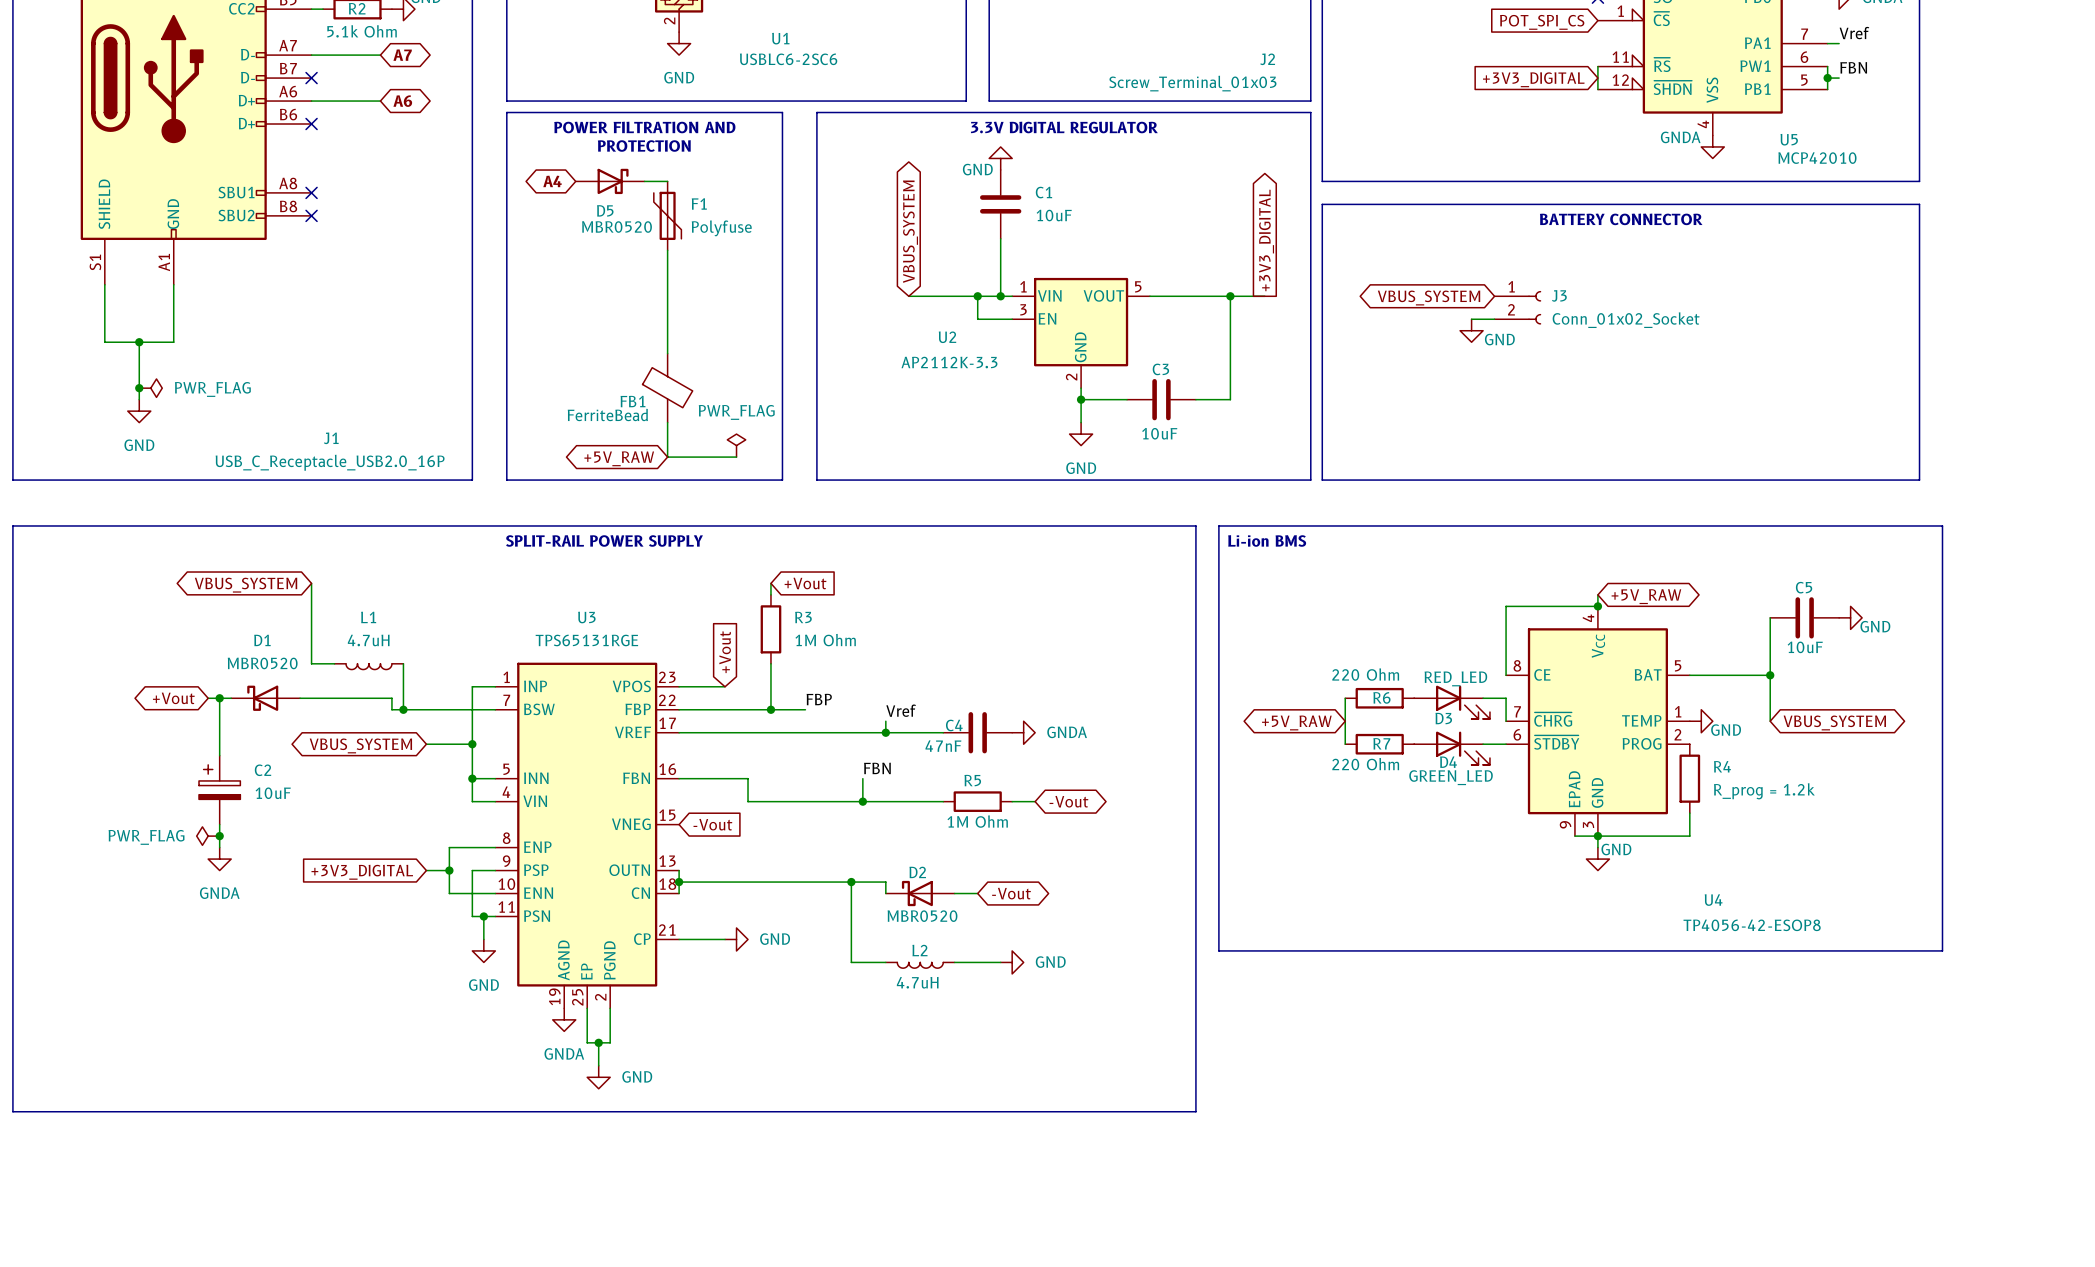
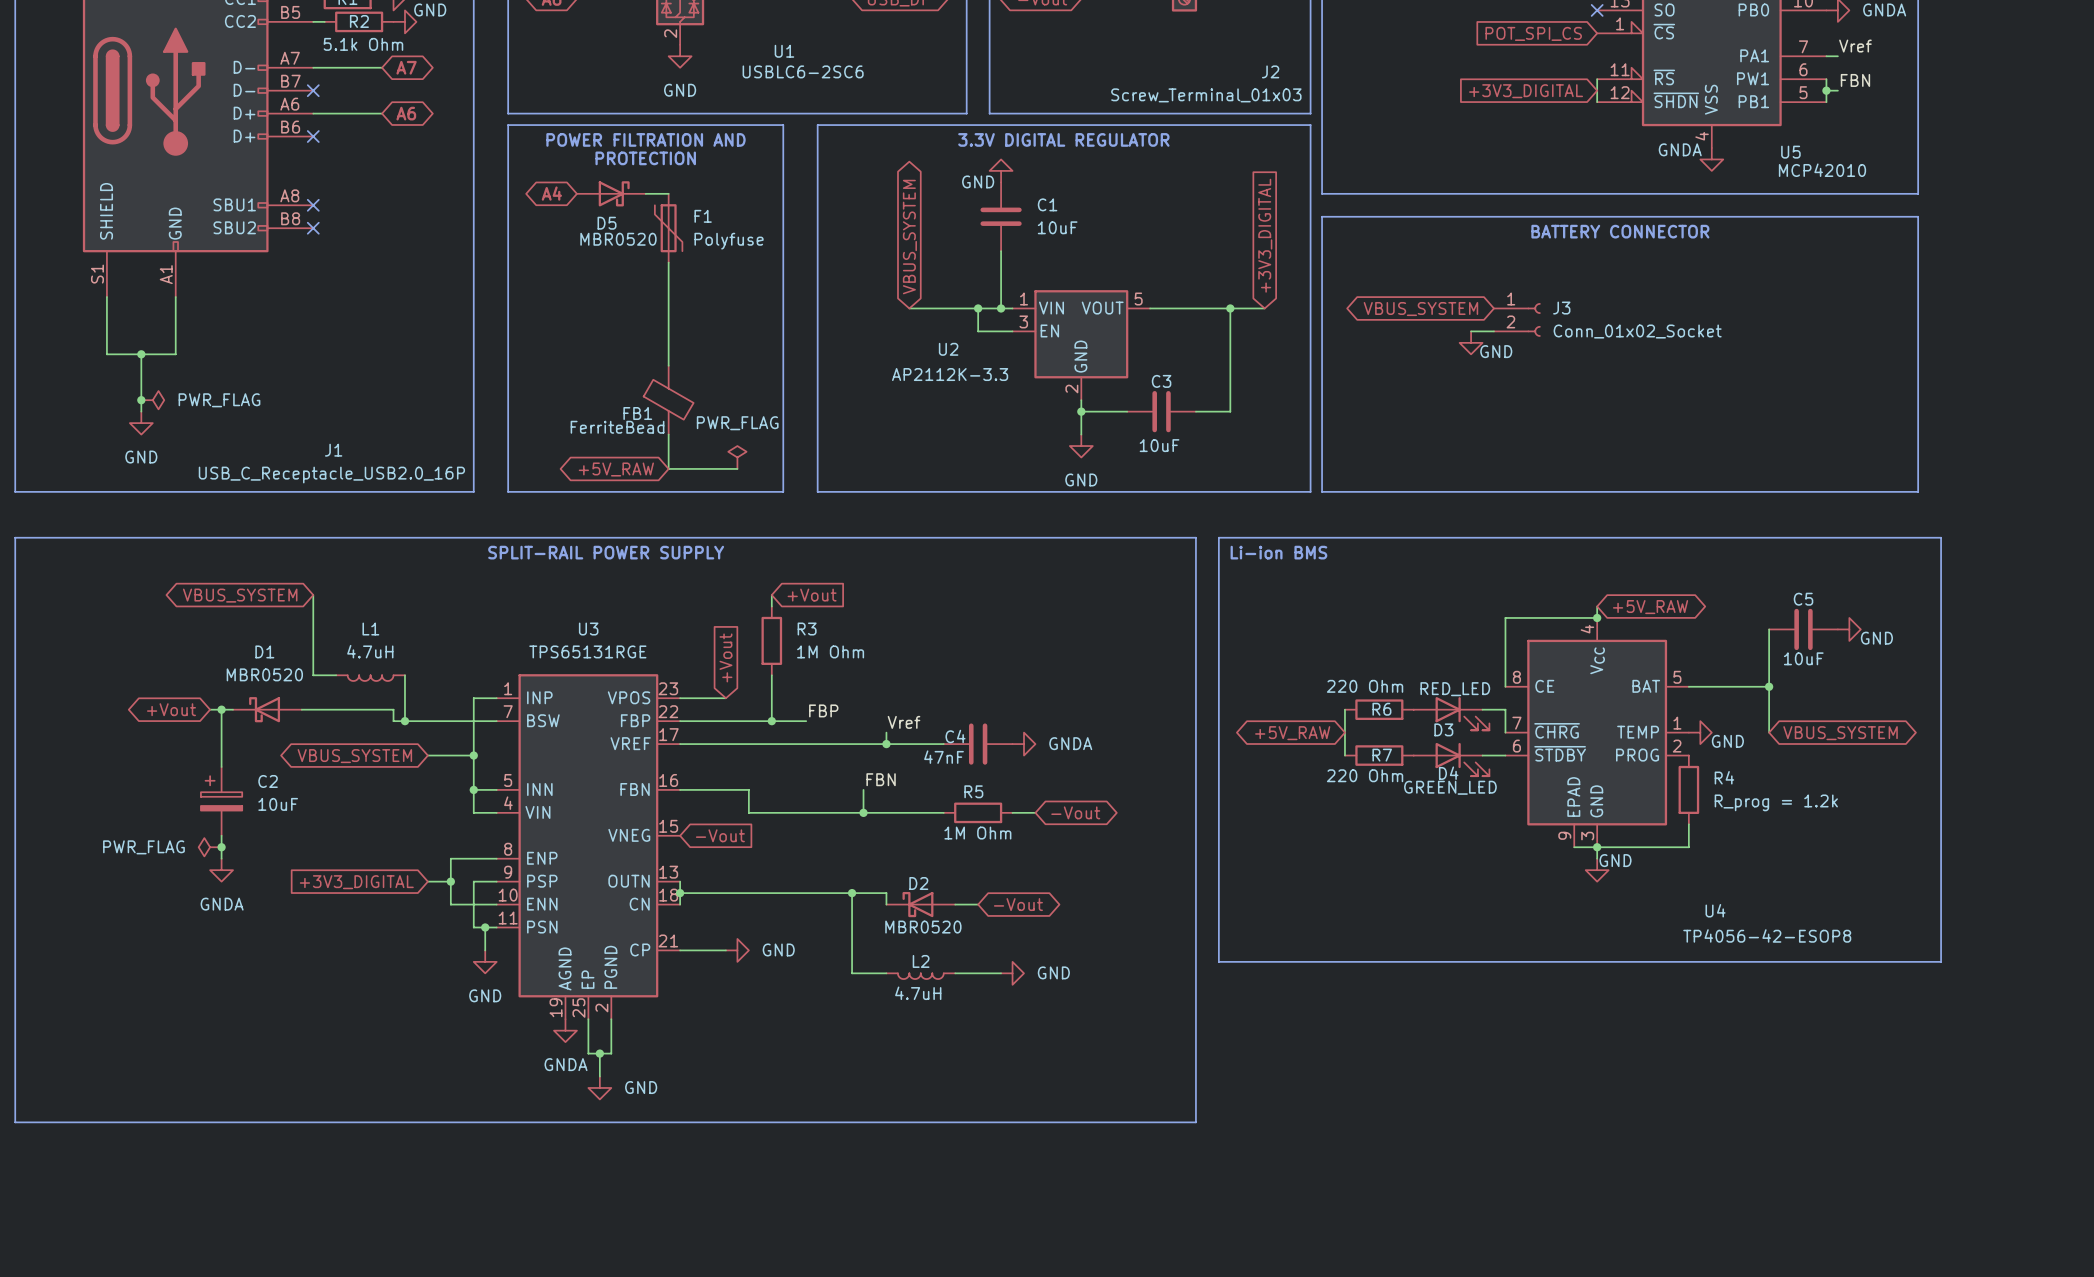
global label shape: output (1266, 240) -> input (1265, 235)

